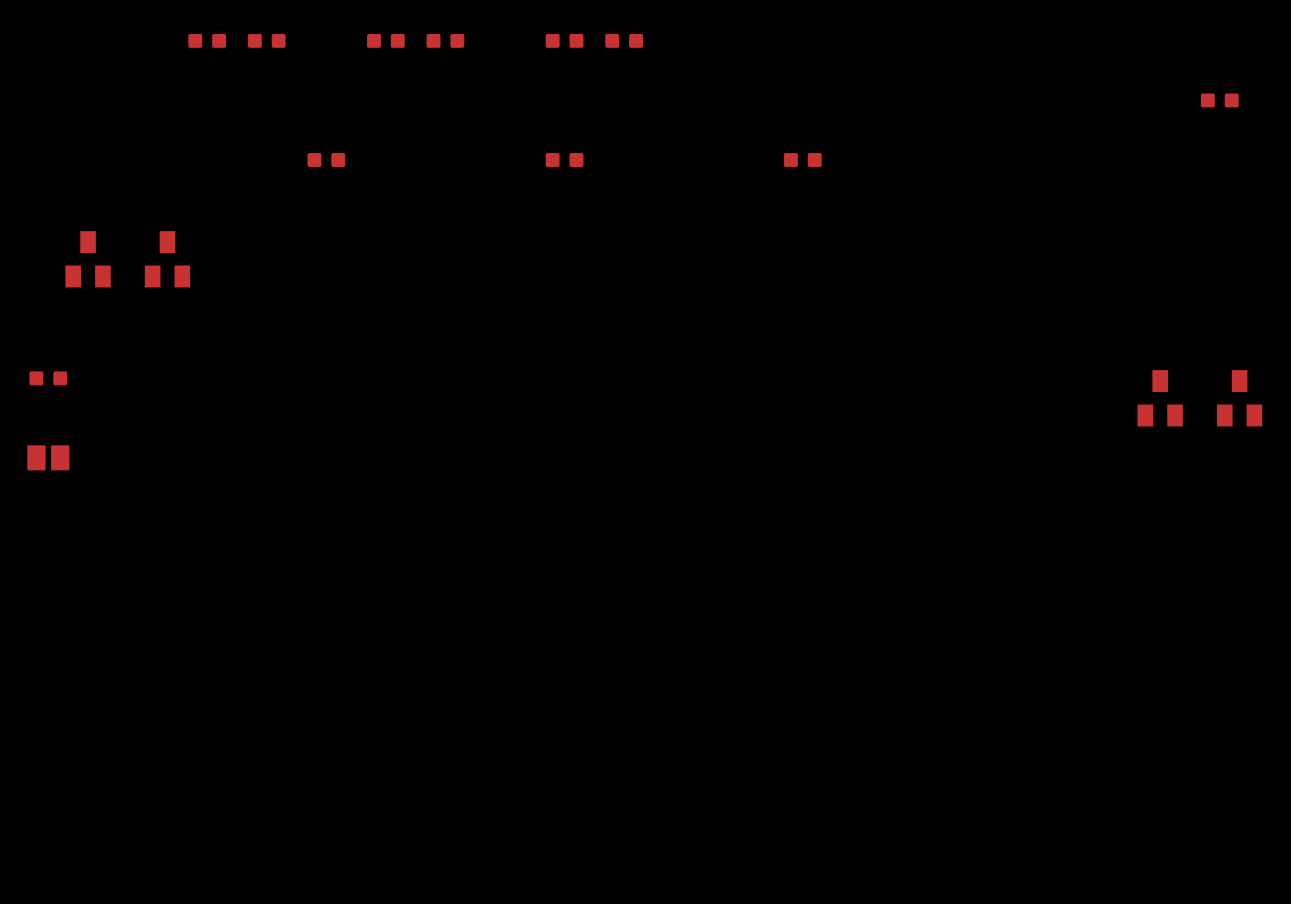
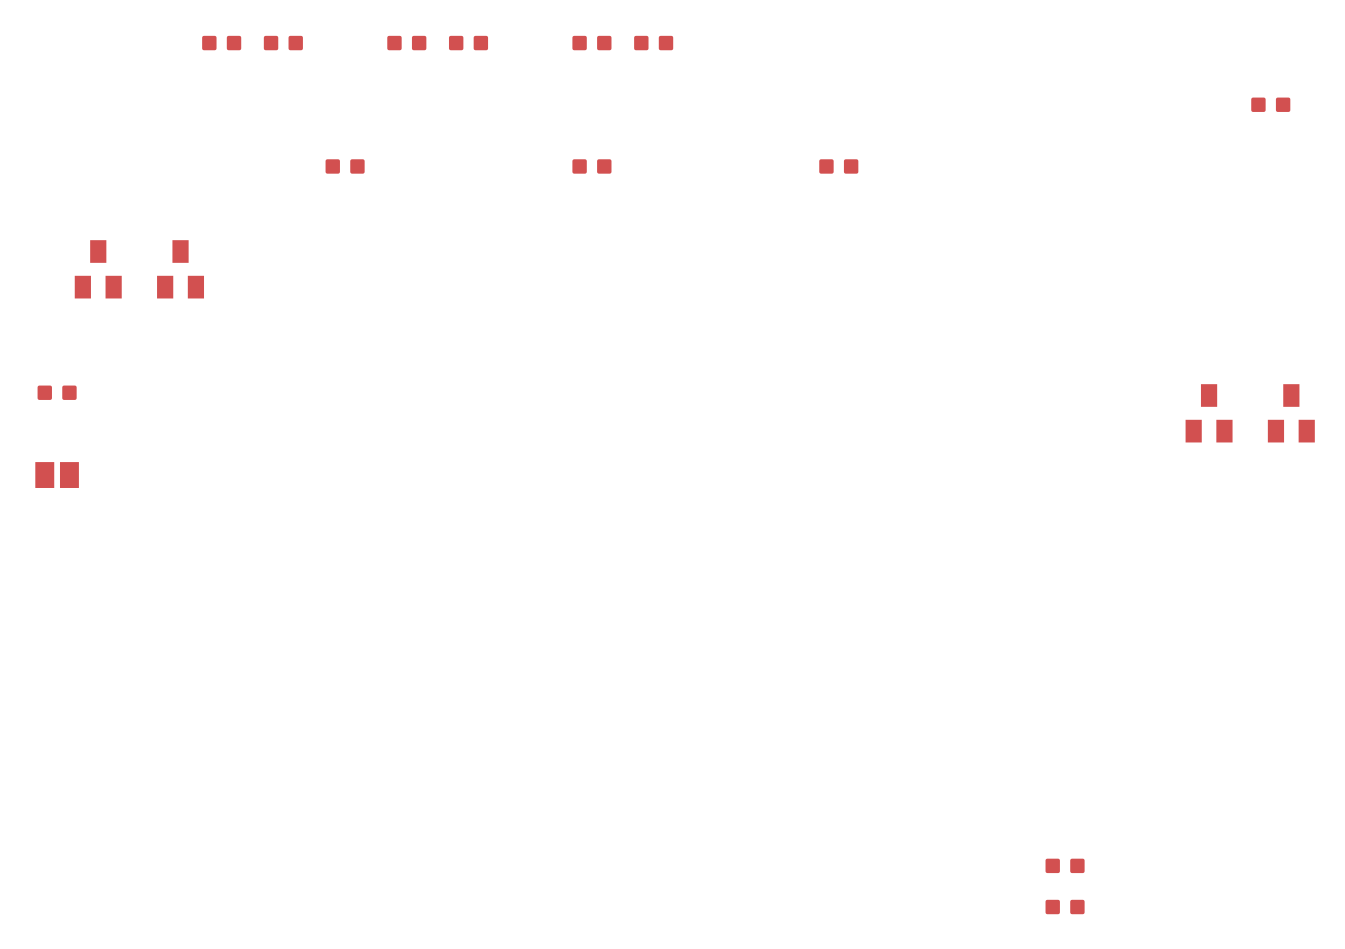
part: none -> (1065, 865)
part: none -> (1065, 907)

